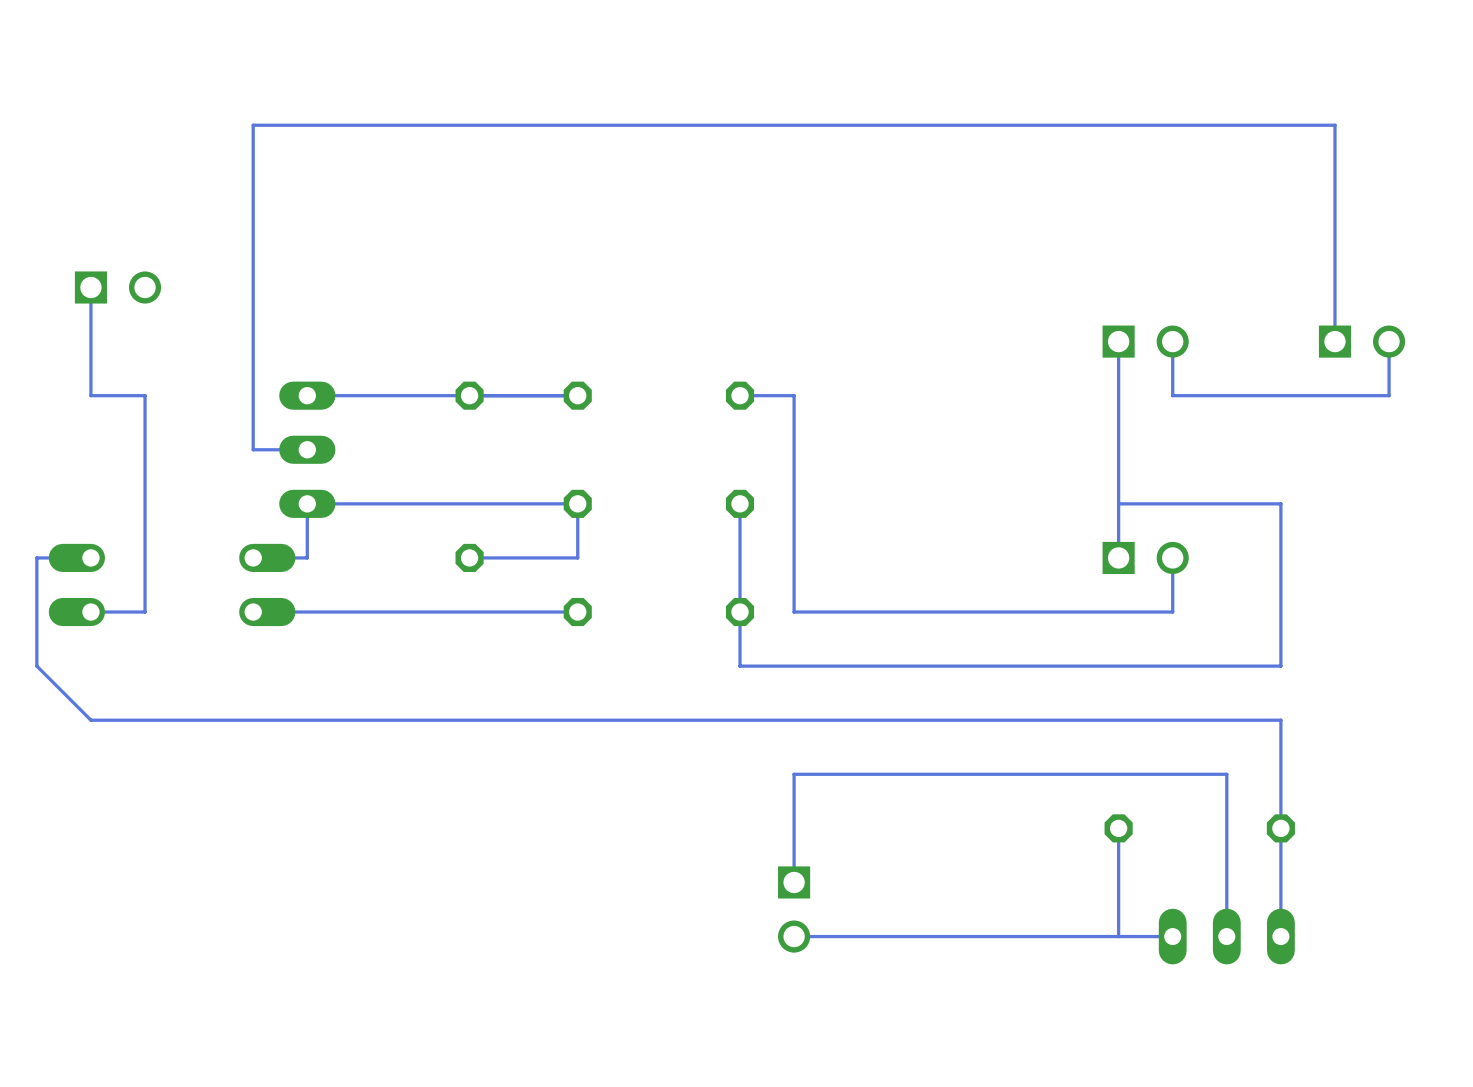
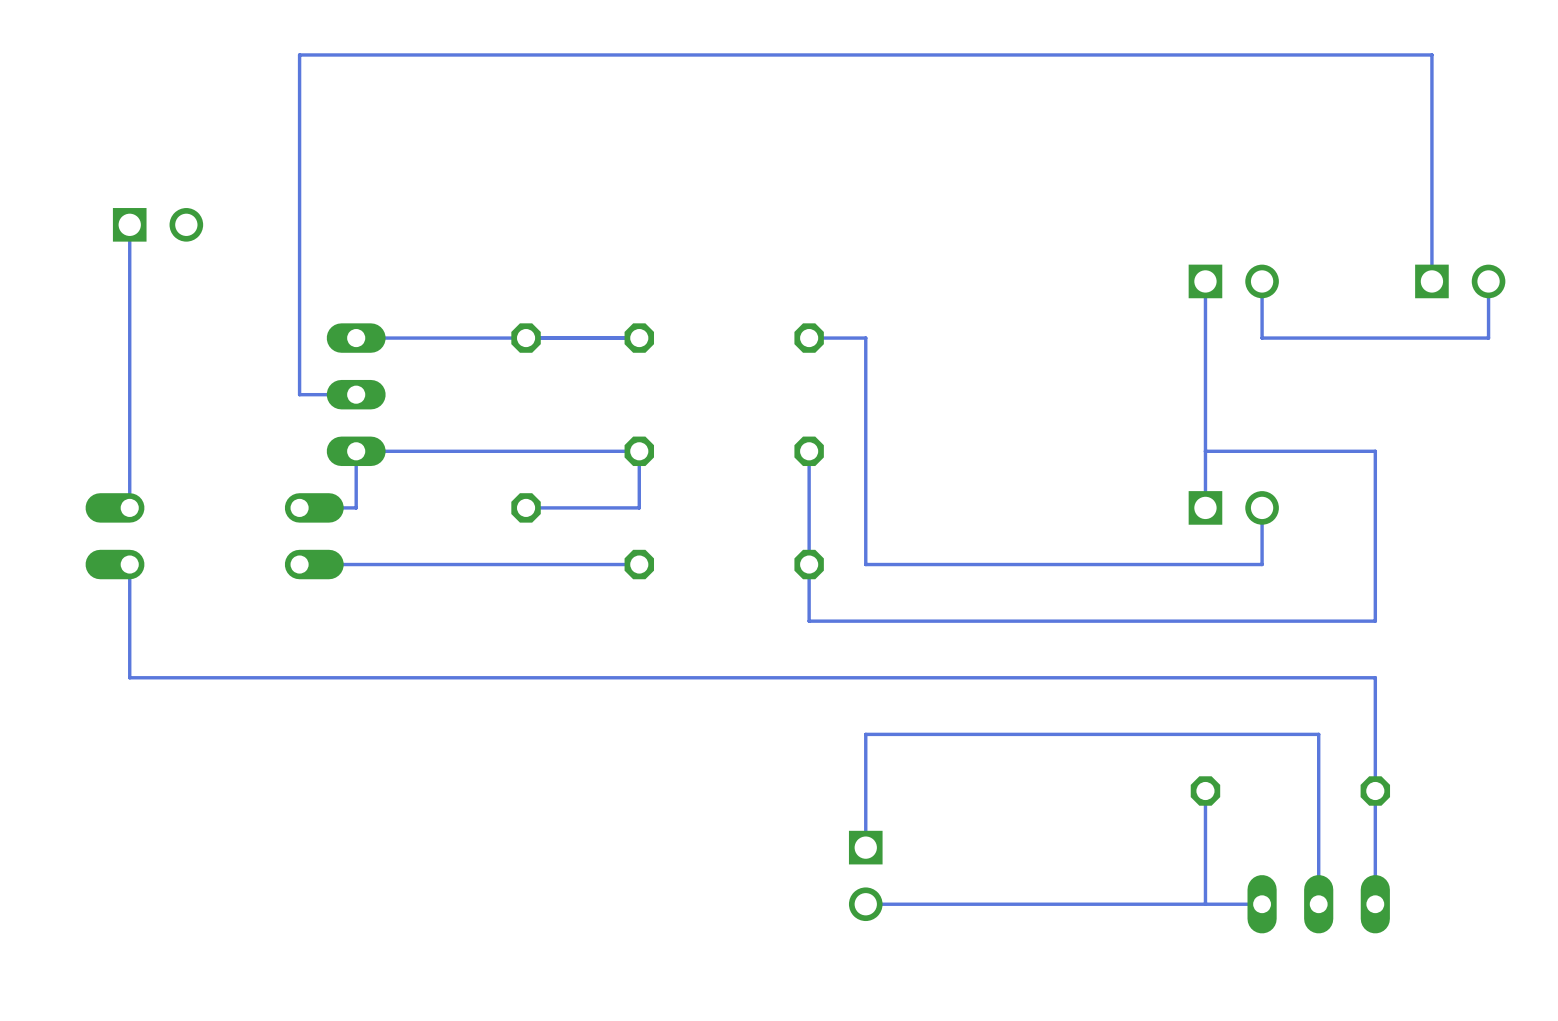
bottom track: (90, 395) (145, 395) (145, 612) (90, 612) -> (129, 338) (129, 507)
bottom track: (90, 557) (36, 557) (36, 666) (90, 720) -> (129, 564) (129, 677)

